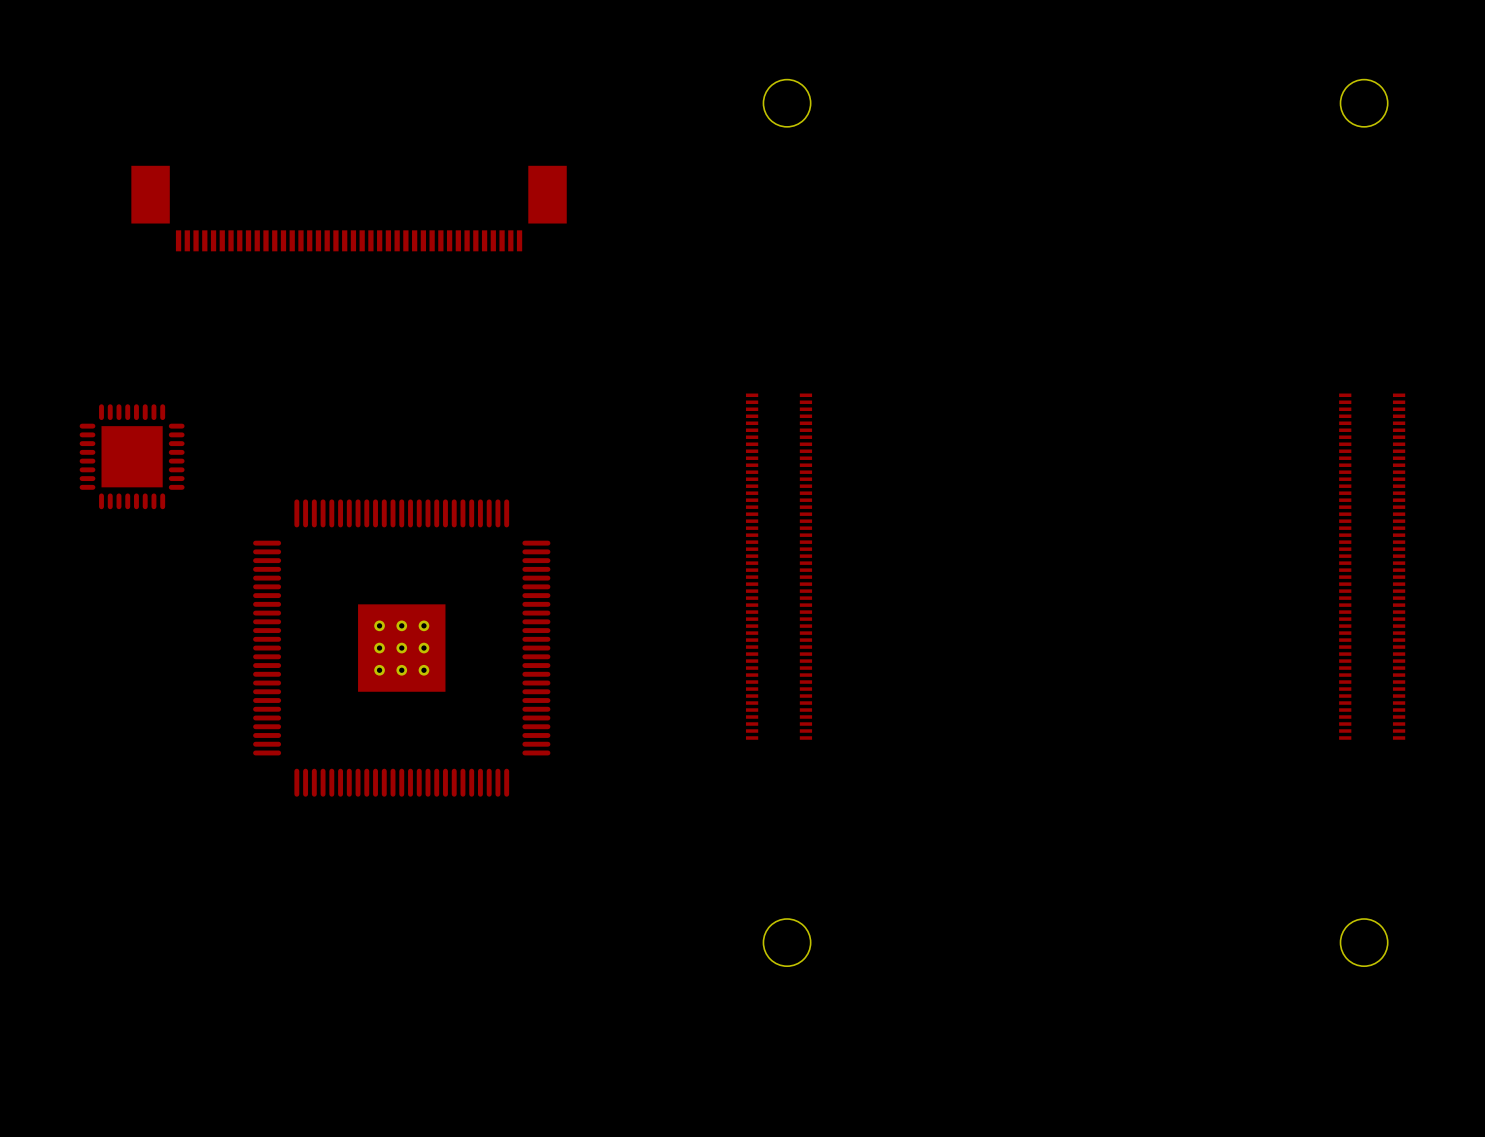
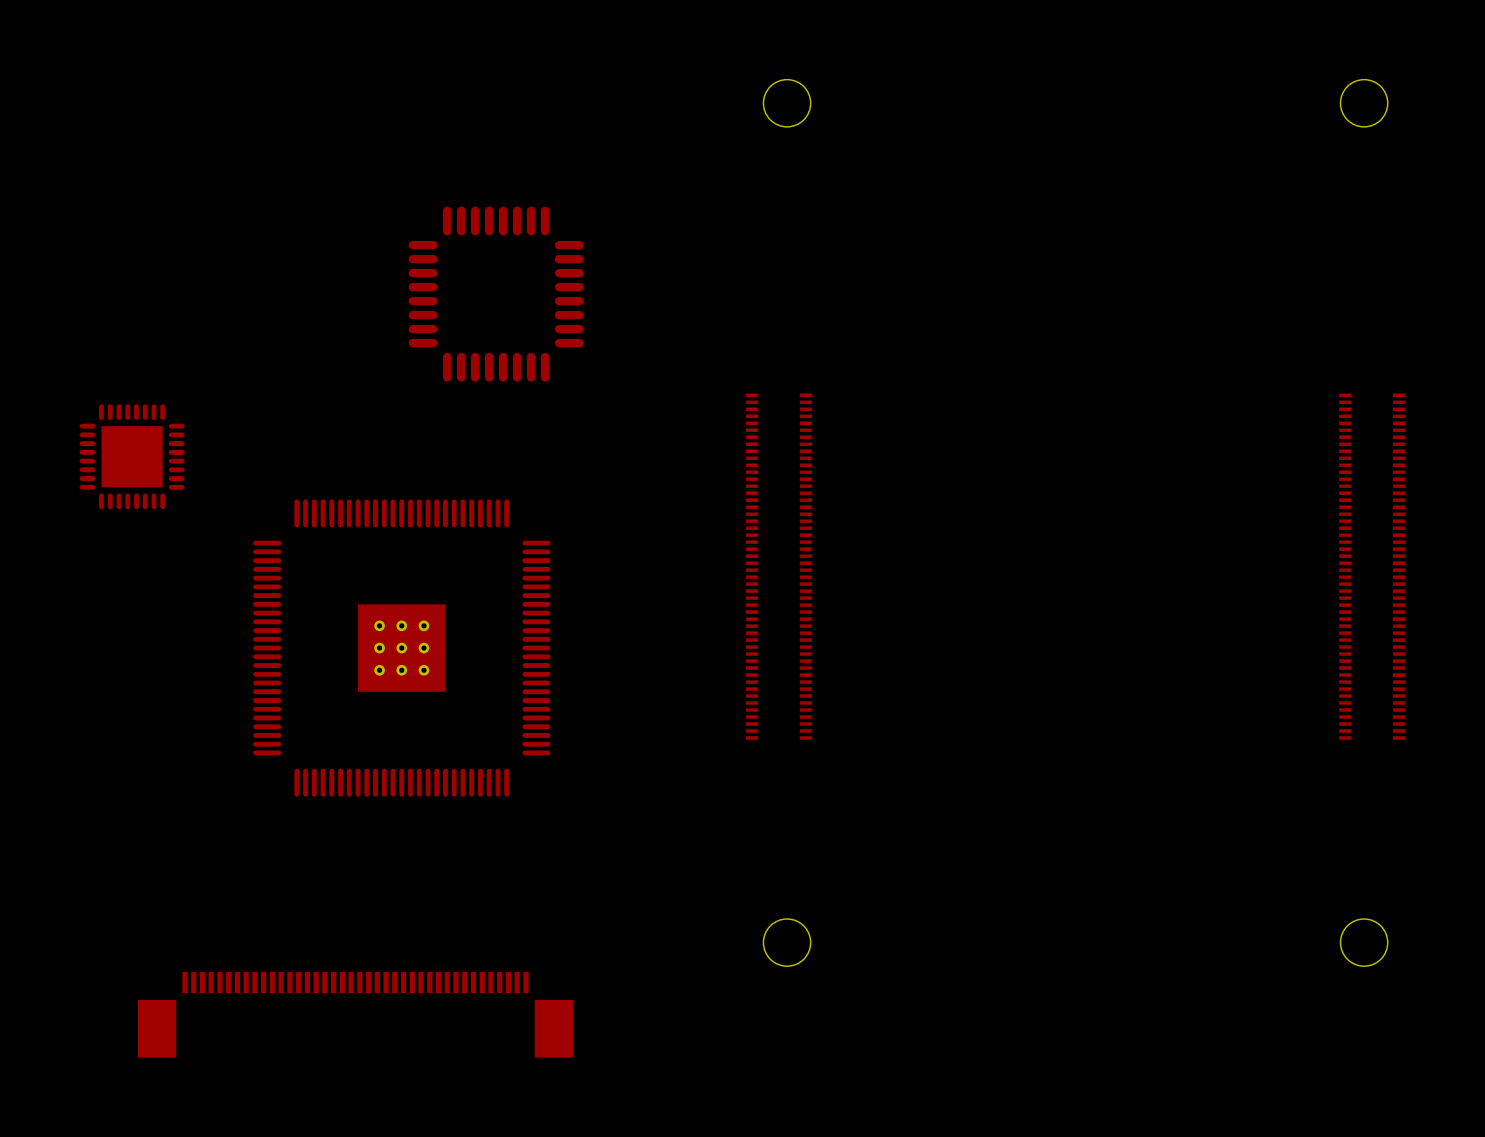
part: (349, 208) -> none
part: none -> (496, 294)
part: none -> (355, 1014)

